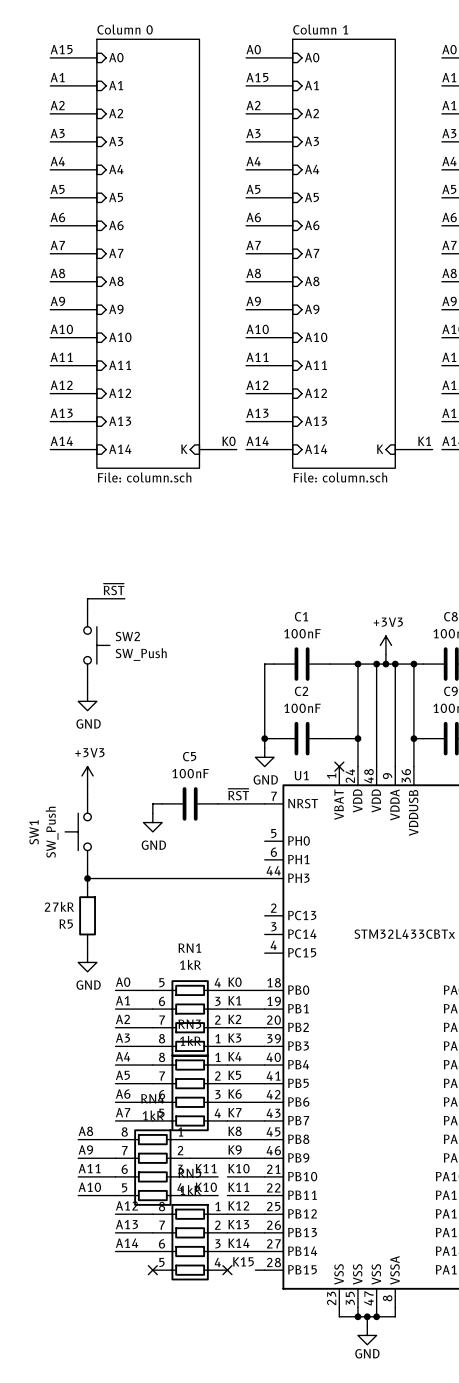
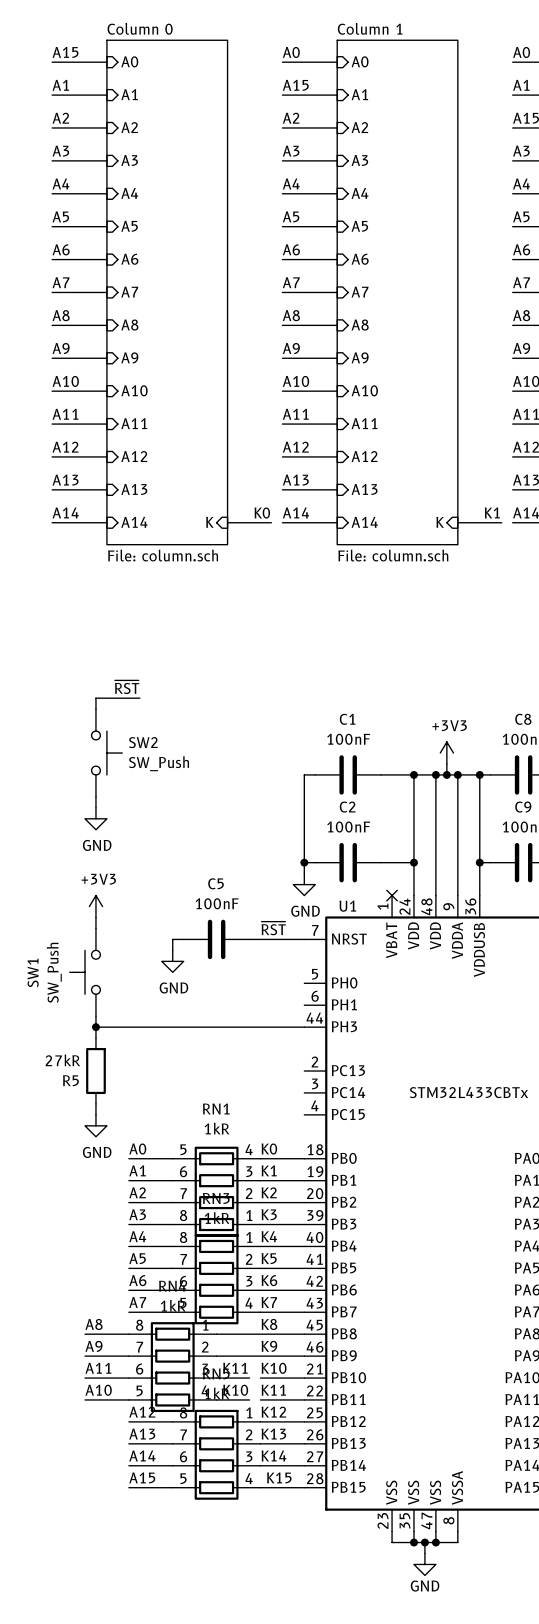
label: none -> A15 (142, 1477)
wire: none -> (128, 1487) (172, 1487)
no-connect mark: (152, 1270) -> none
wire: none -> (260, 1487) (293, 1487)
no-connect mark: (227, 1270) -> none

